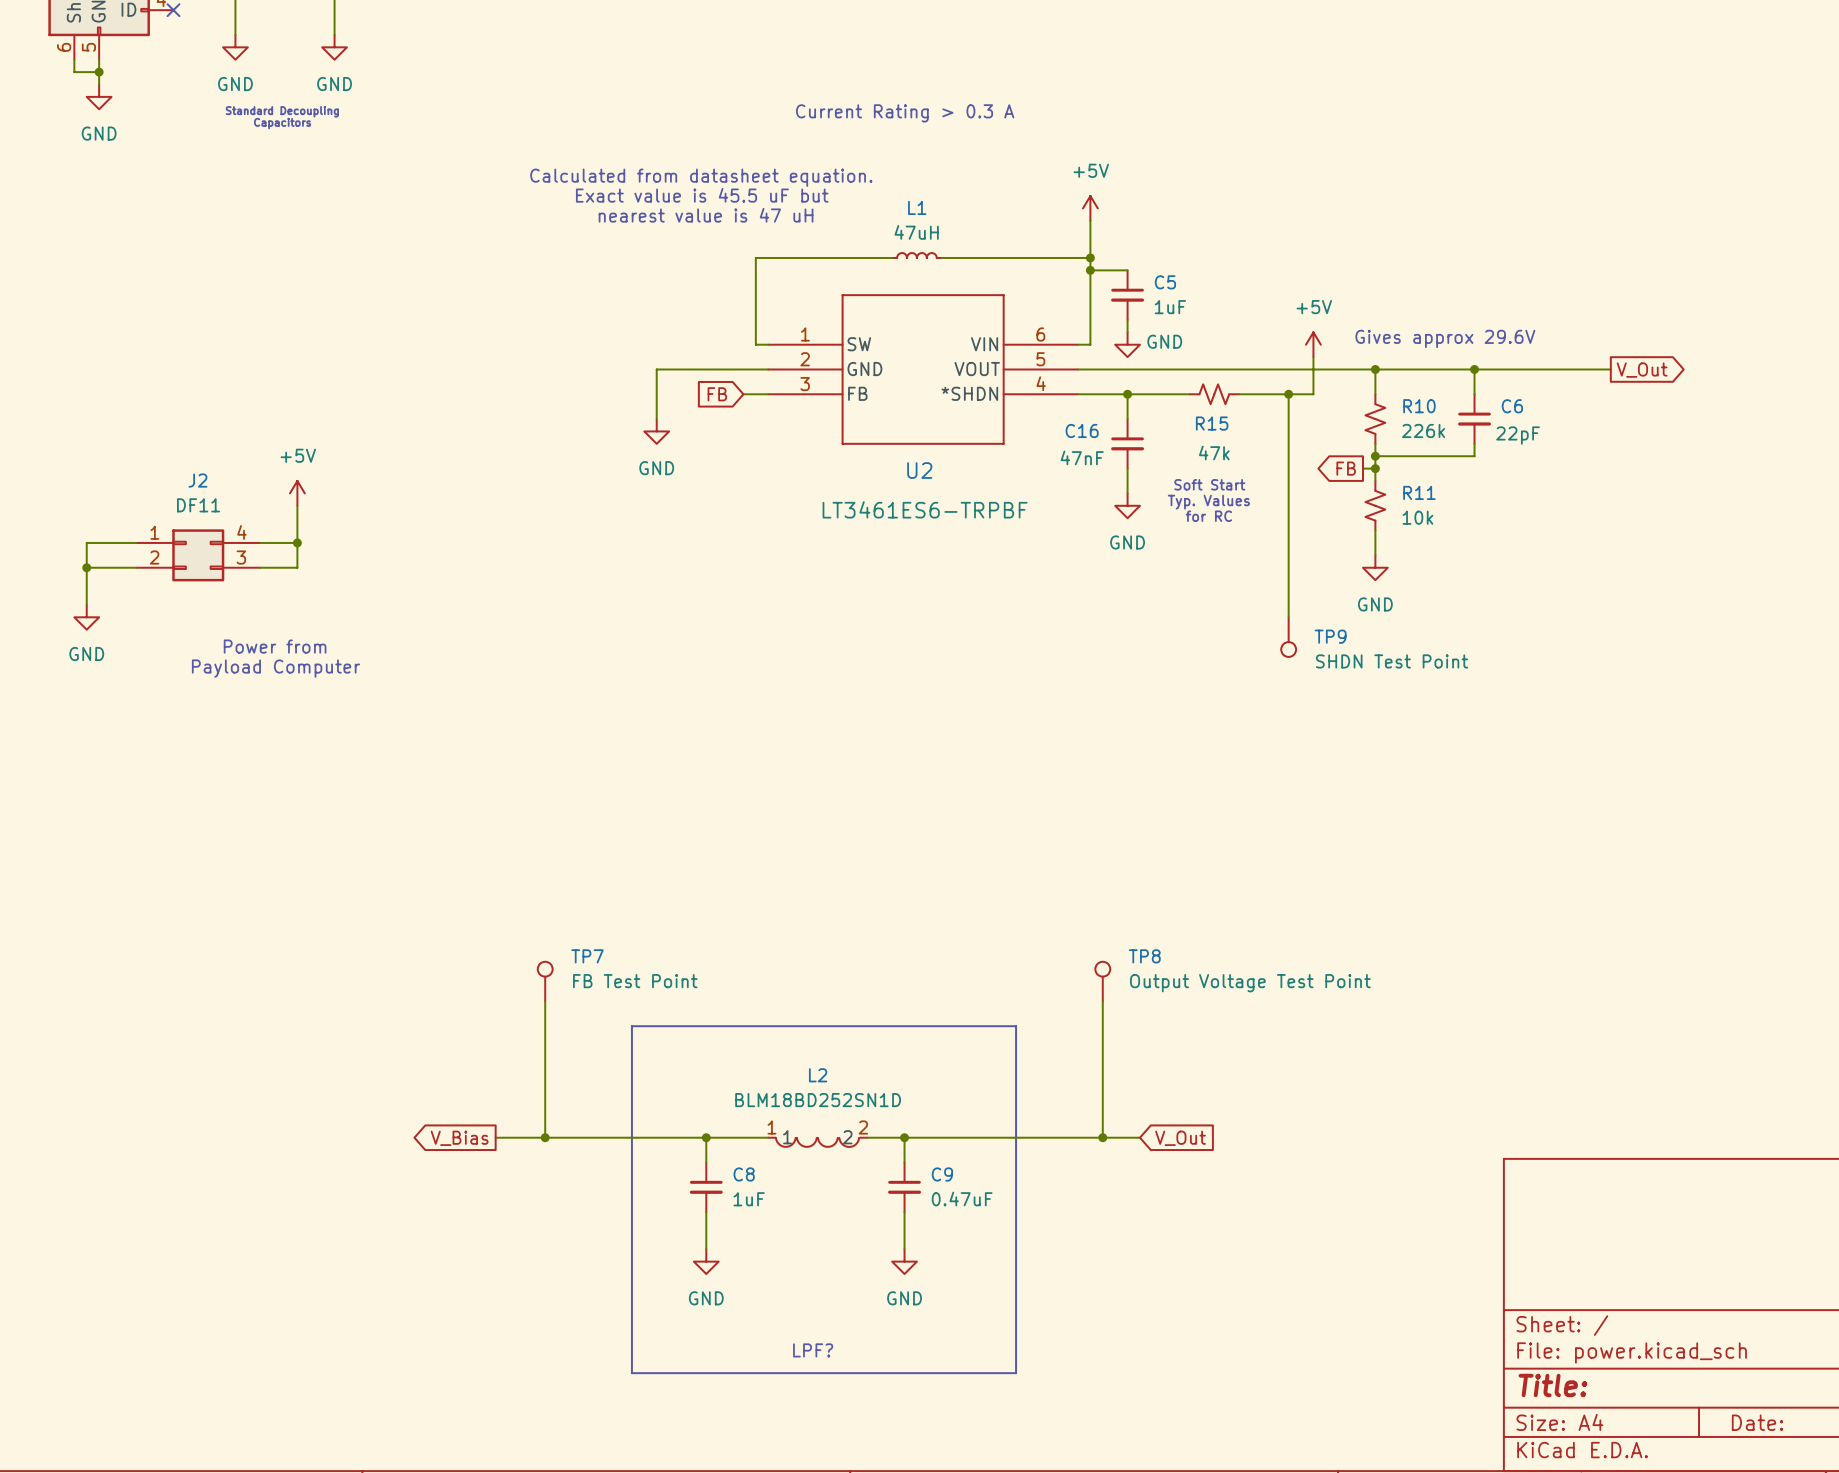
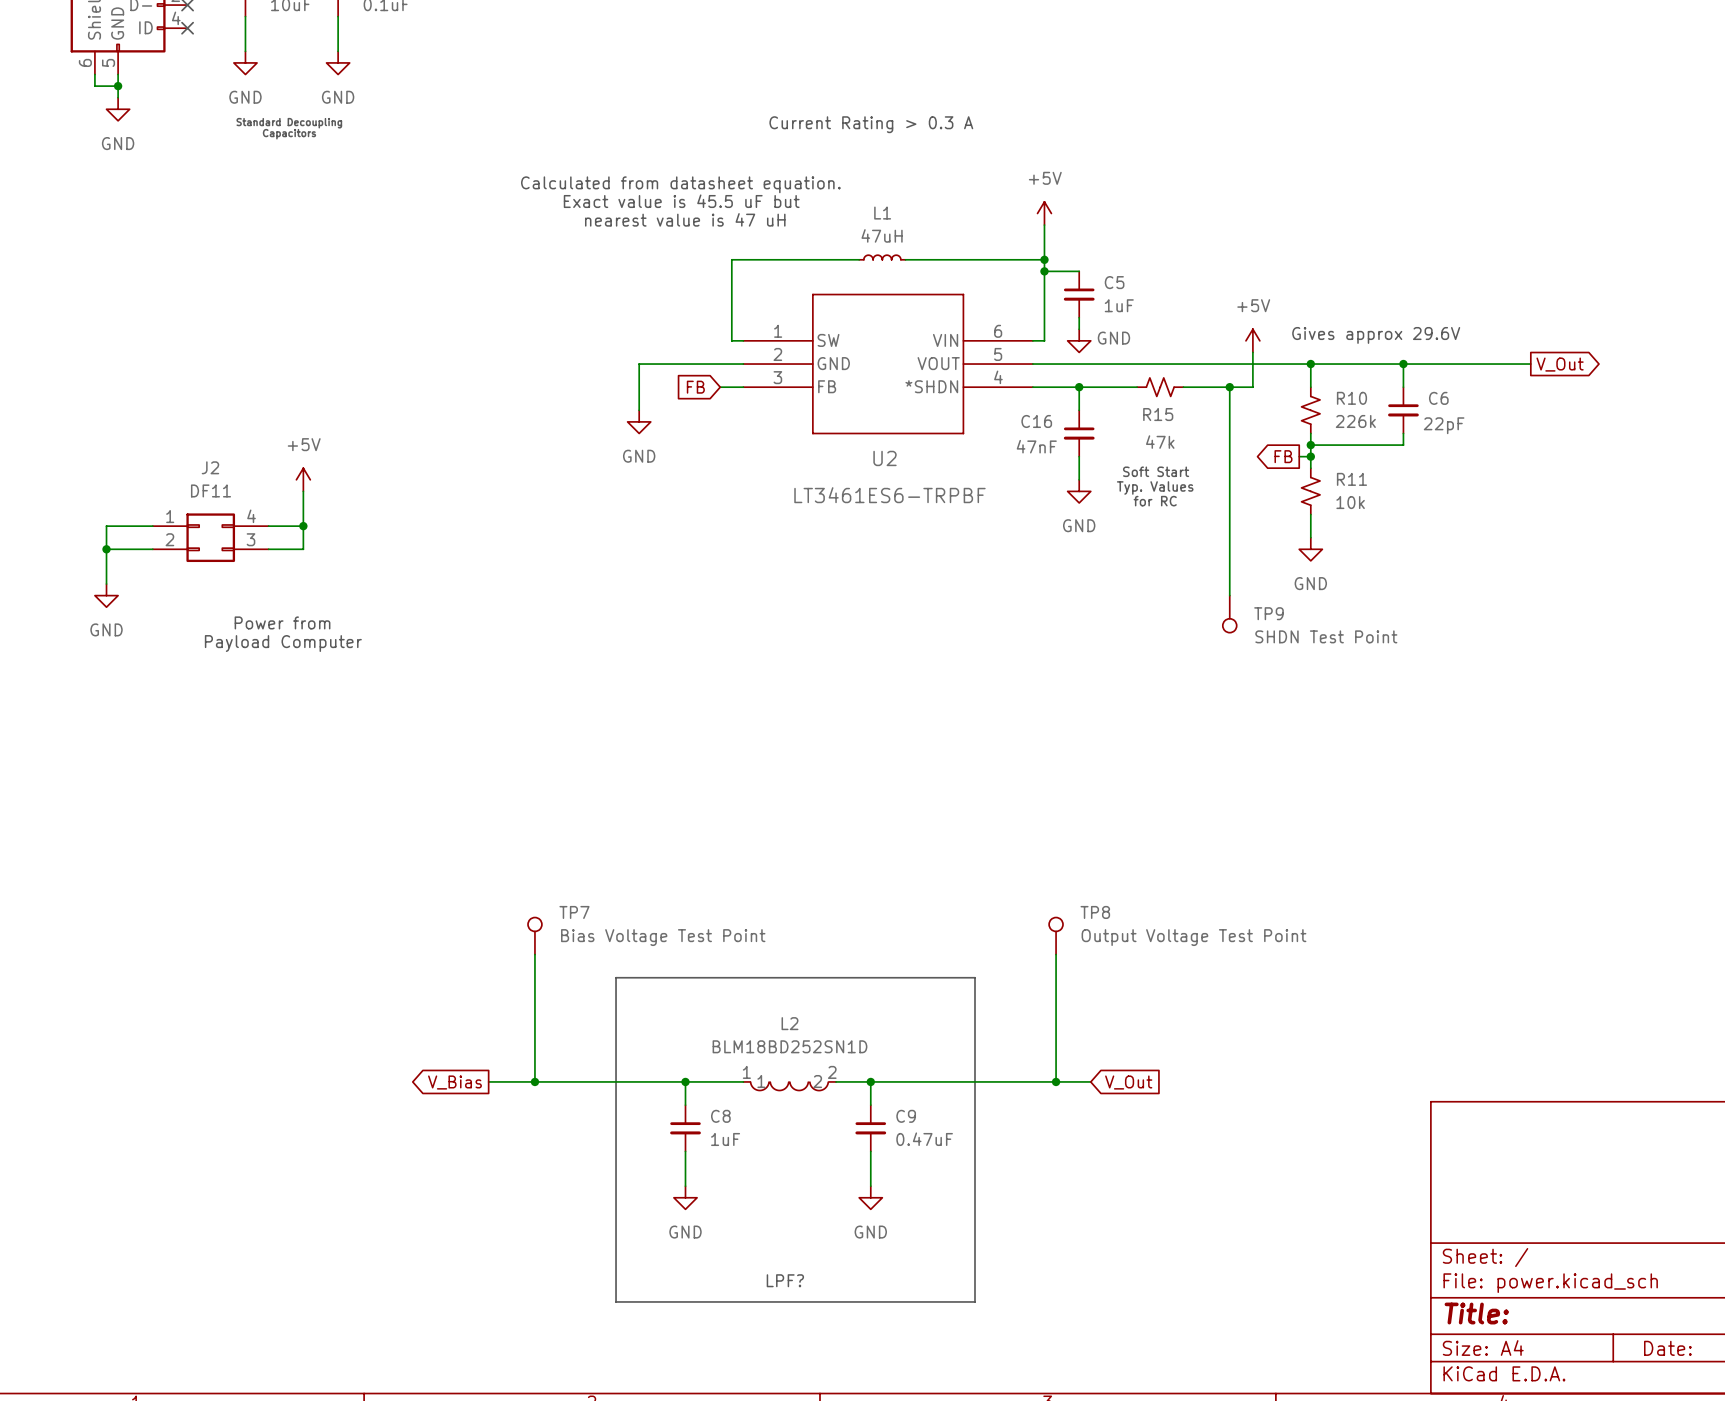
TP7 value: FB Test Point (635, 981) -> Bias Voltage Test Point (663, 937)

